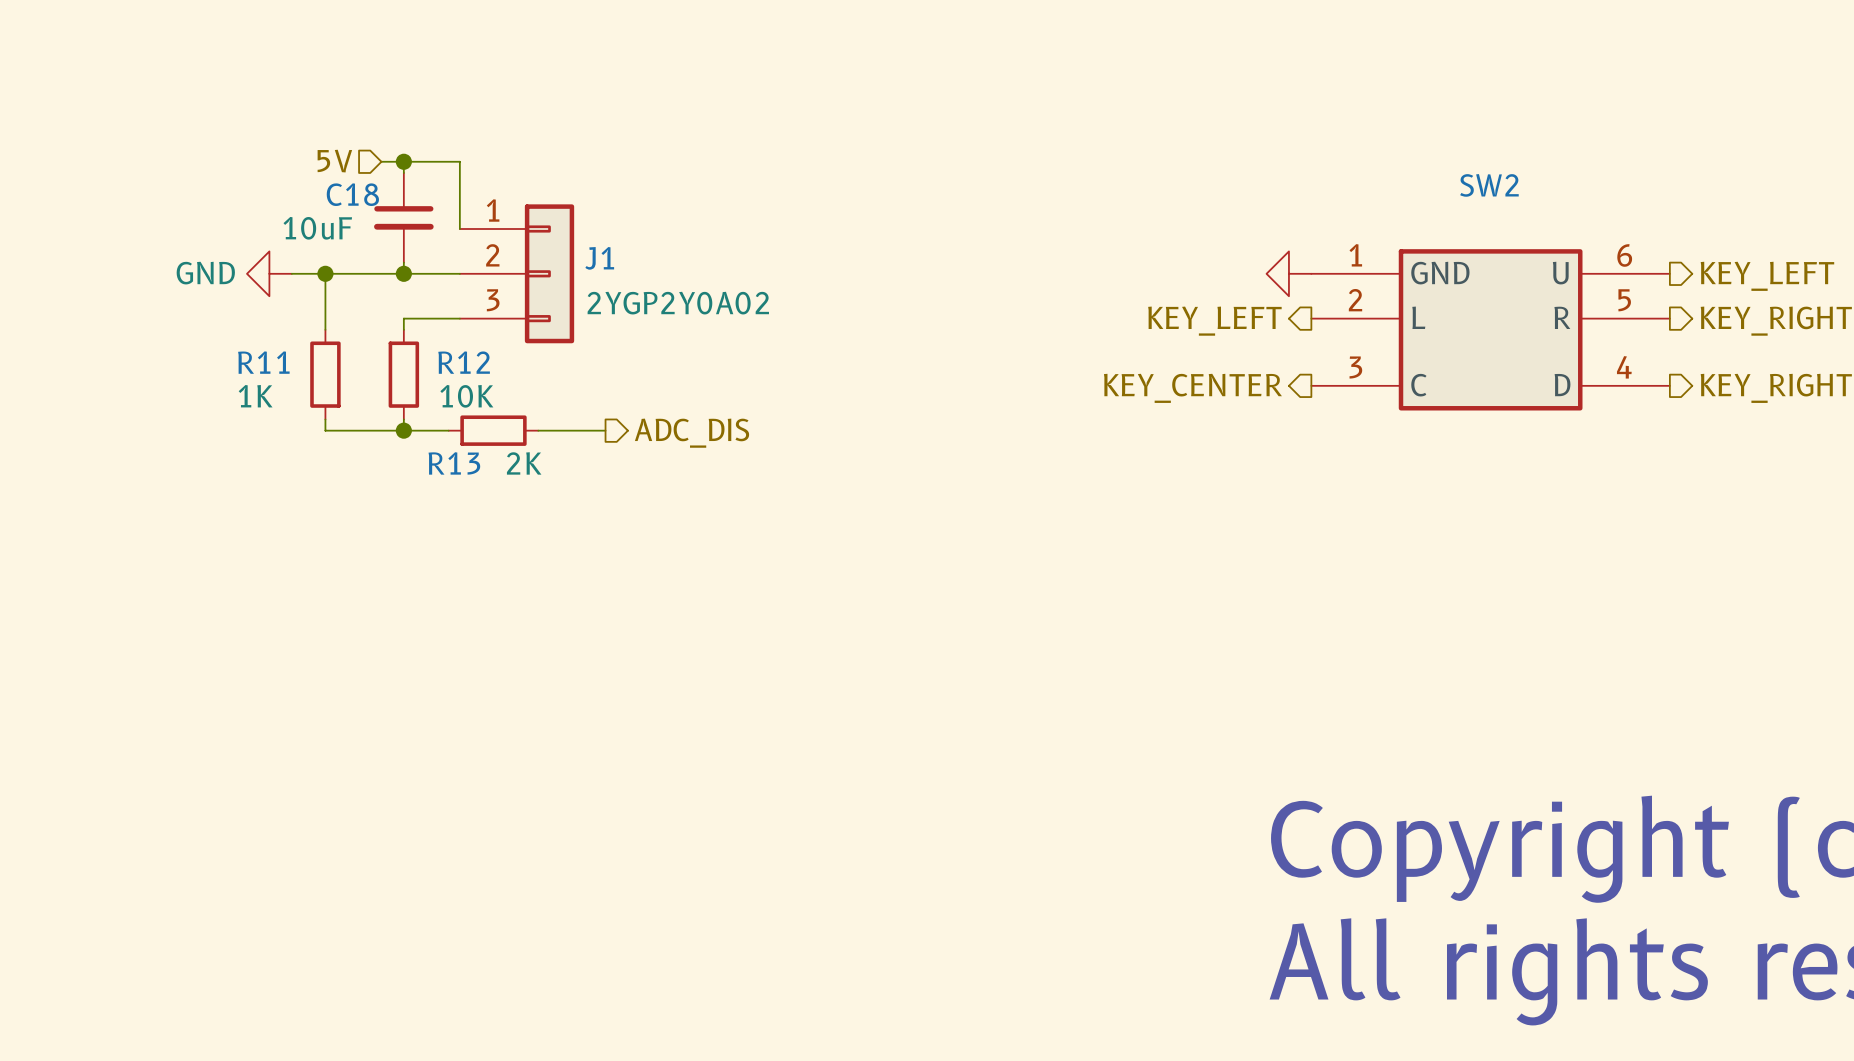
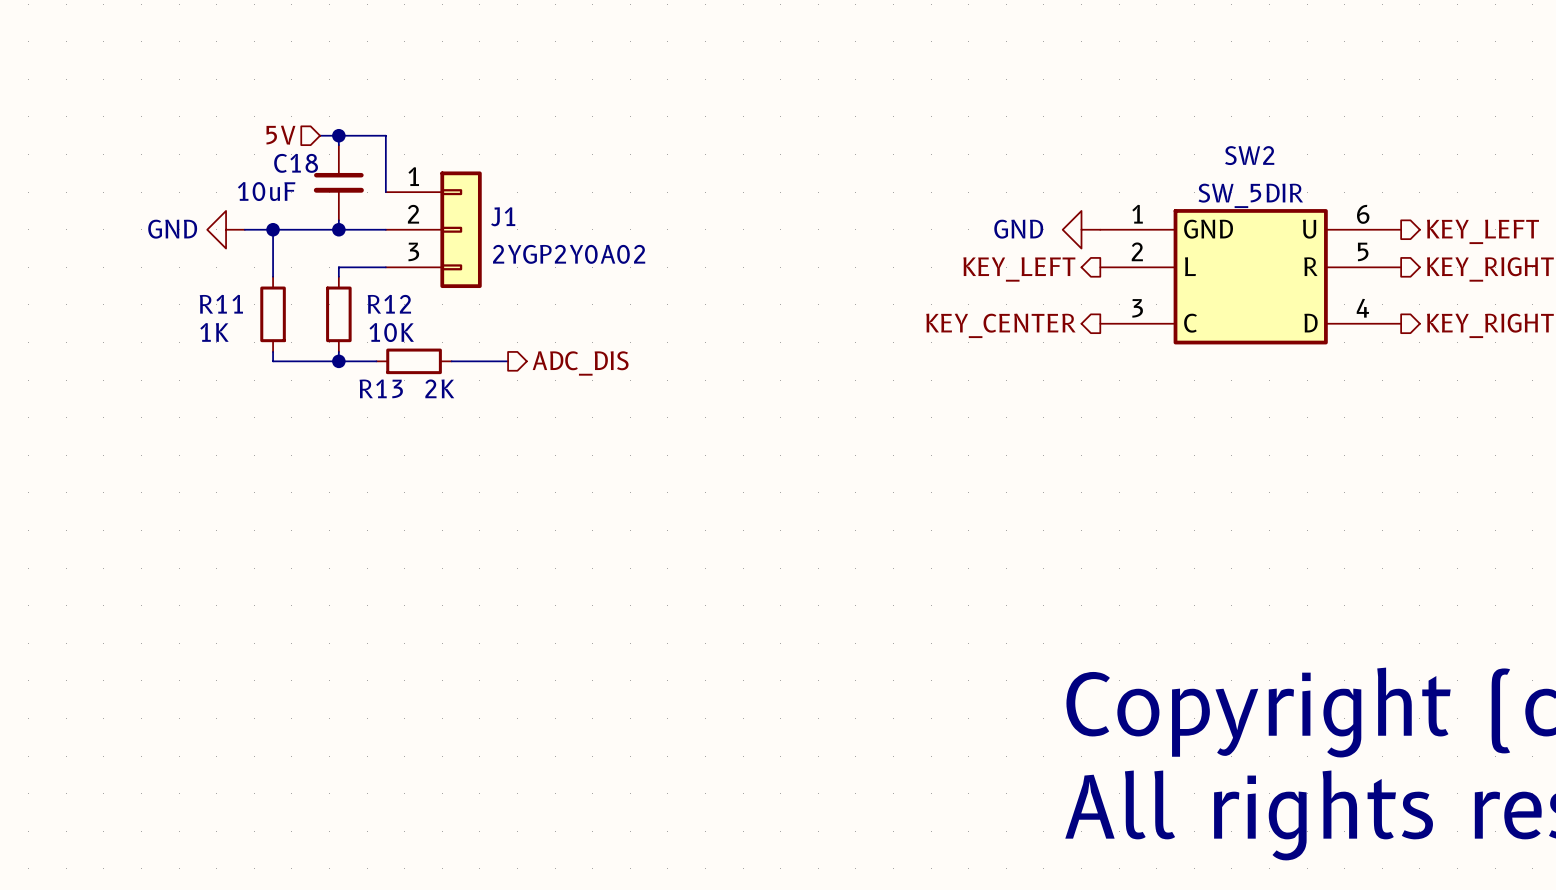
SW2 value: none -> SW_5DIR (1250, 195)
power symbol text: none -> GND (1018, 229)

